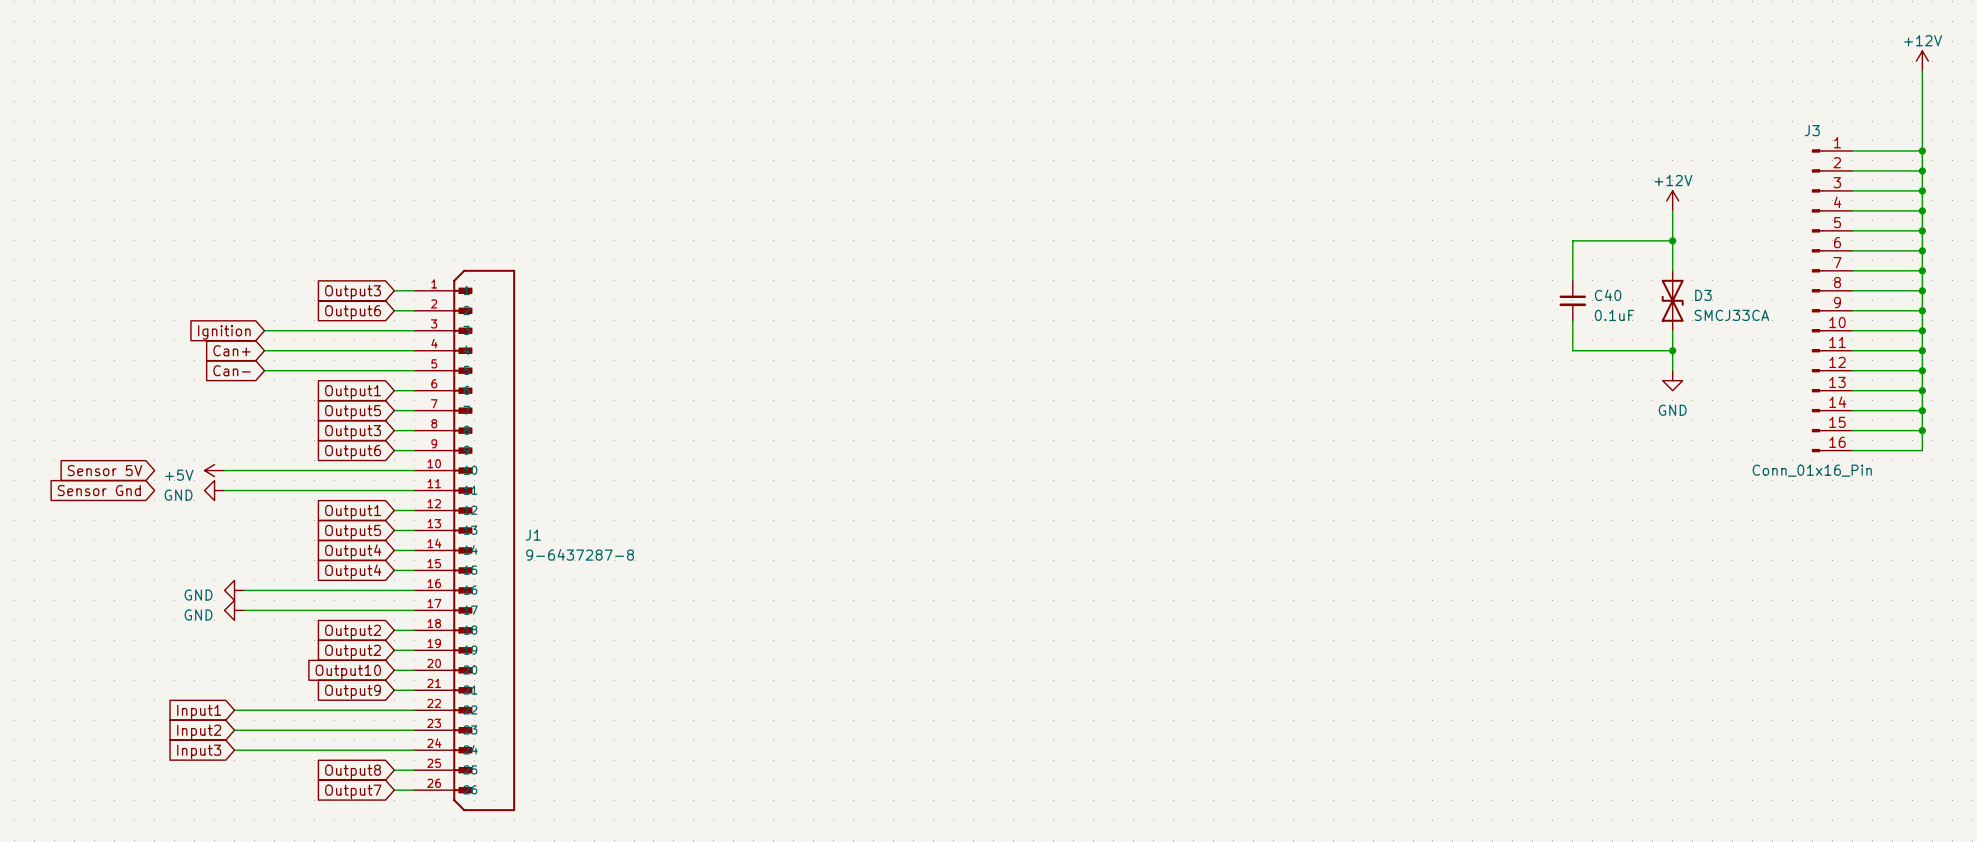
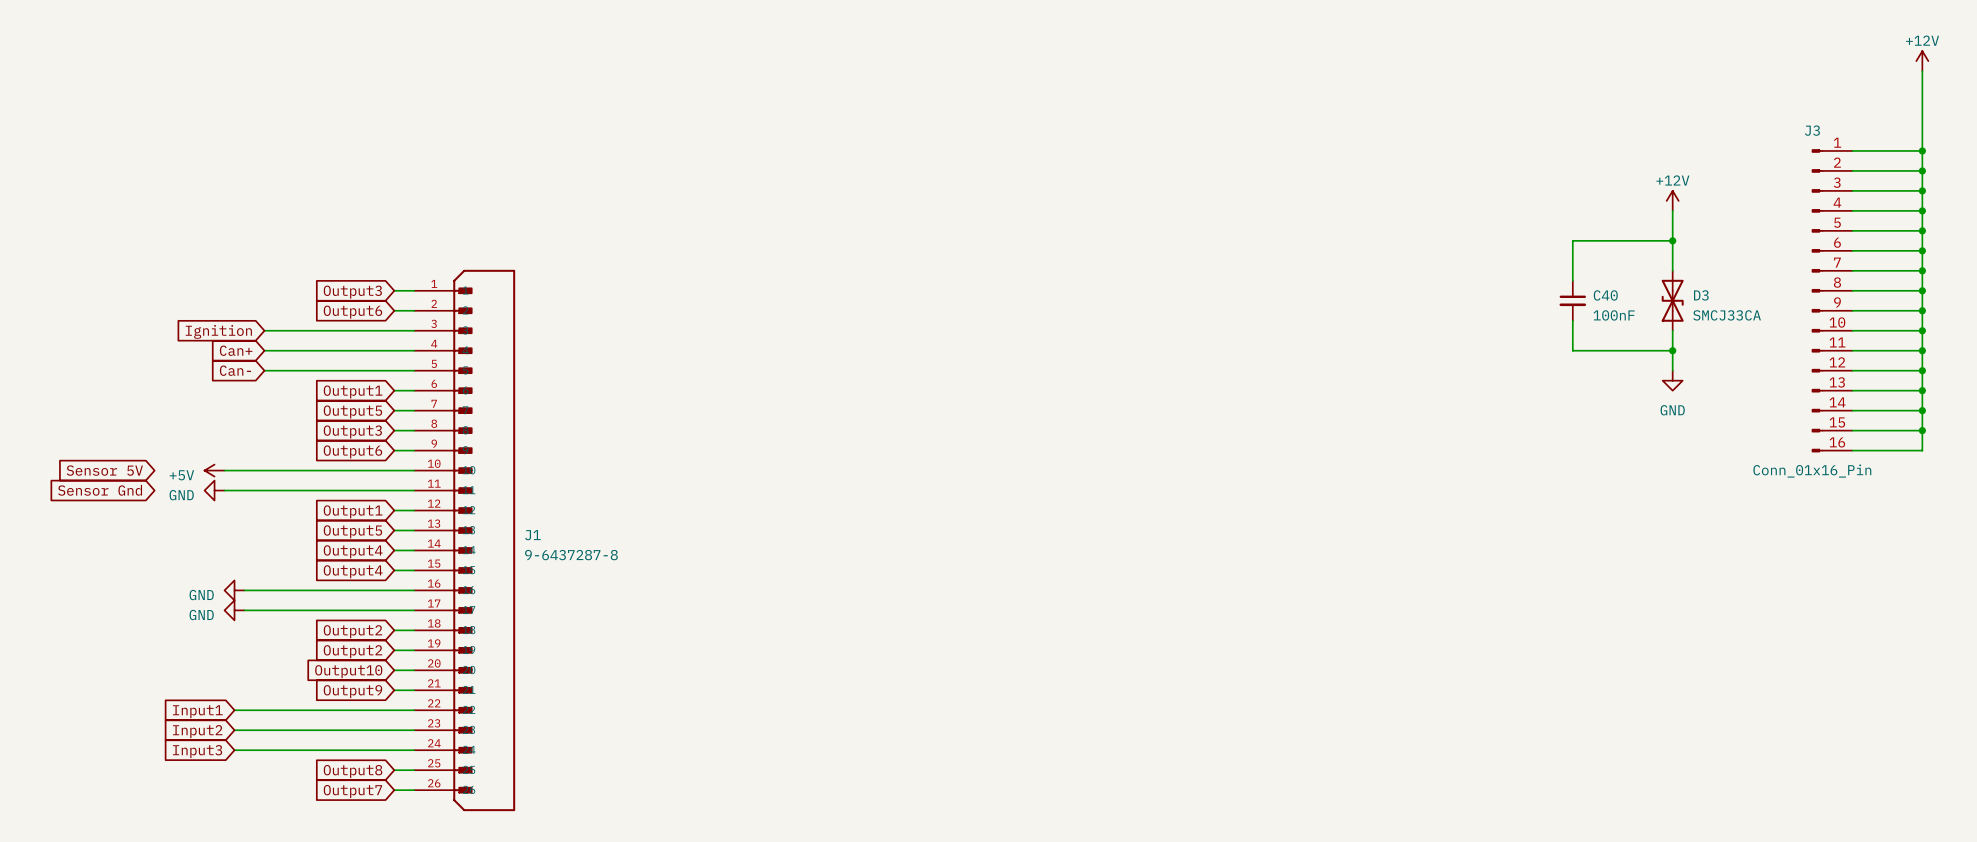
C40 value: 0.1uF (1614, 315) -> 100nF (1614, 315)

